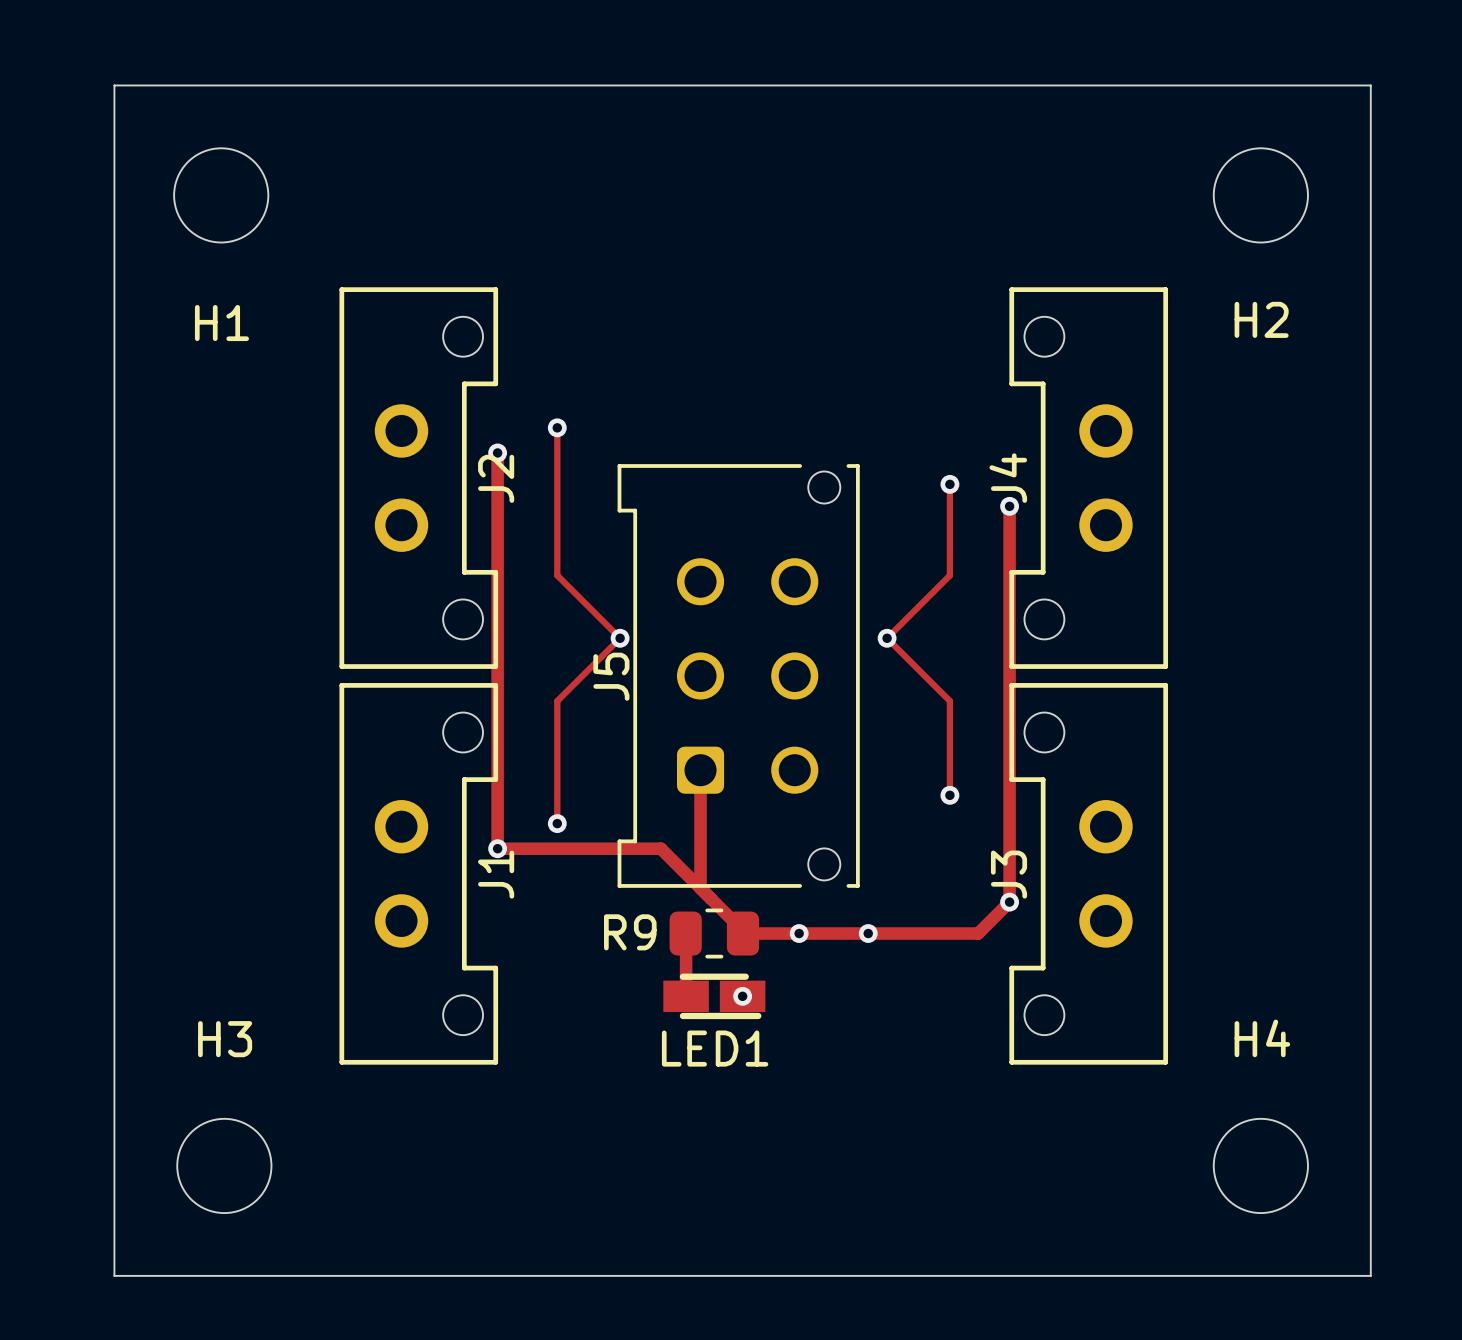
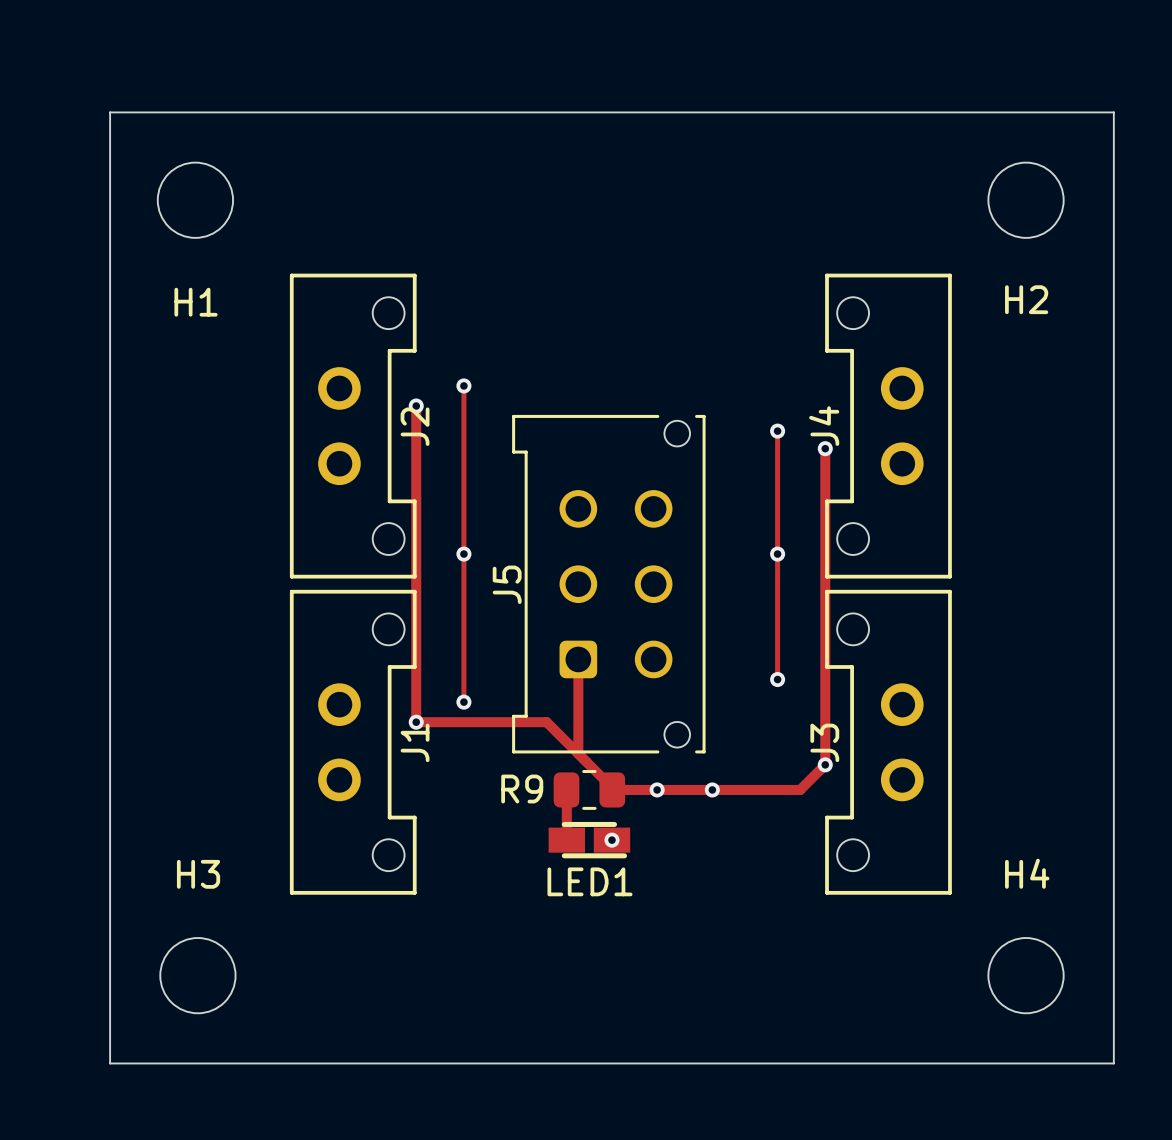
track: (557, 575) (620, 638) (557, 701) -> (463, 503) (463, 604)
track: (949, 575) (887, 638) (949, 701) -> (777, 503) (777, 604)
via position: (620, 638) -> (463, 554)
via position: (887, 638) -> (777, 554)

